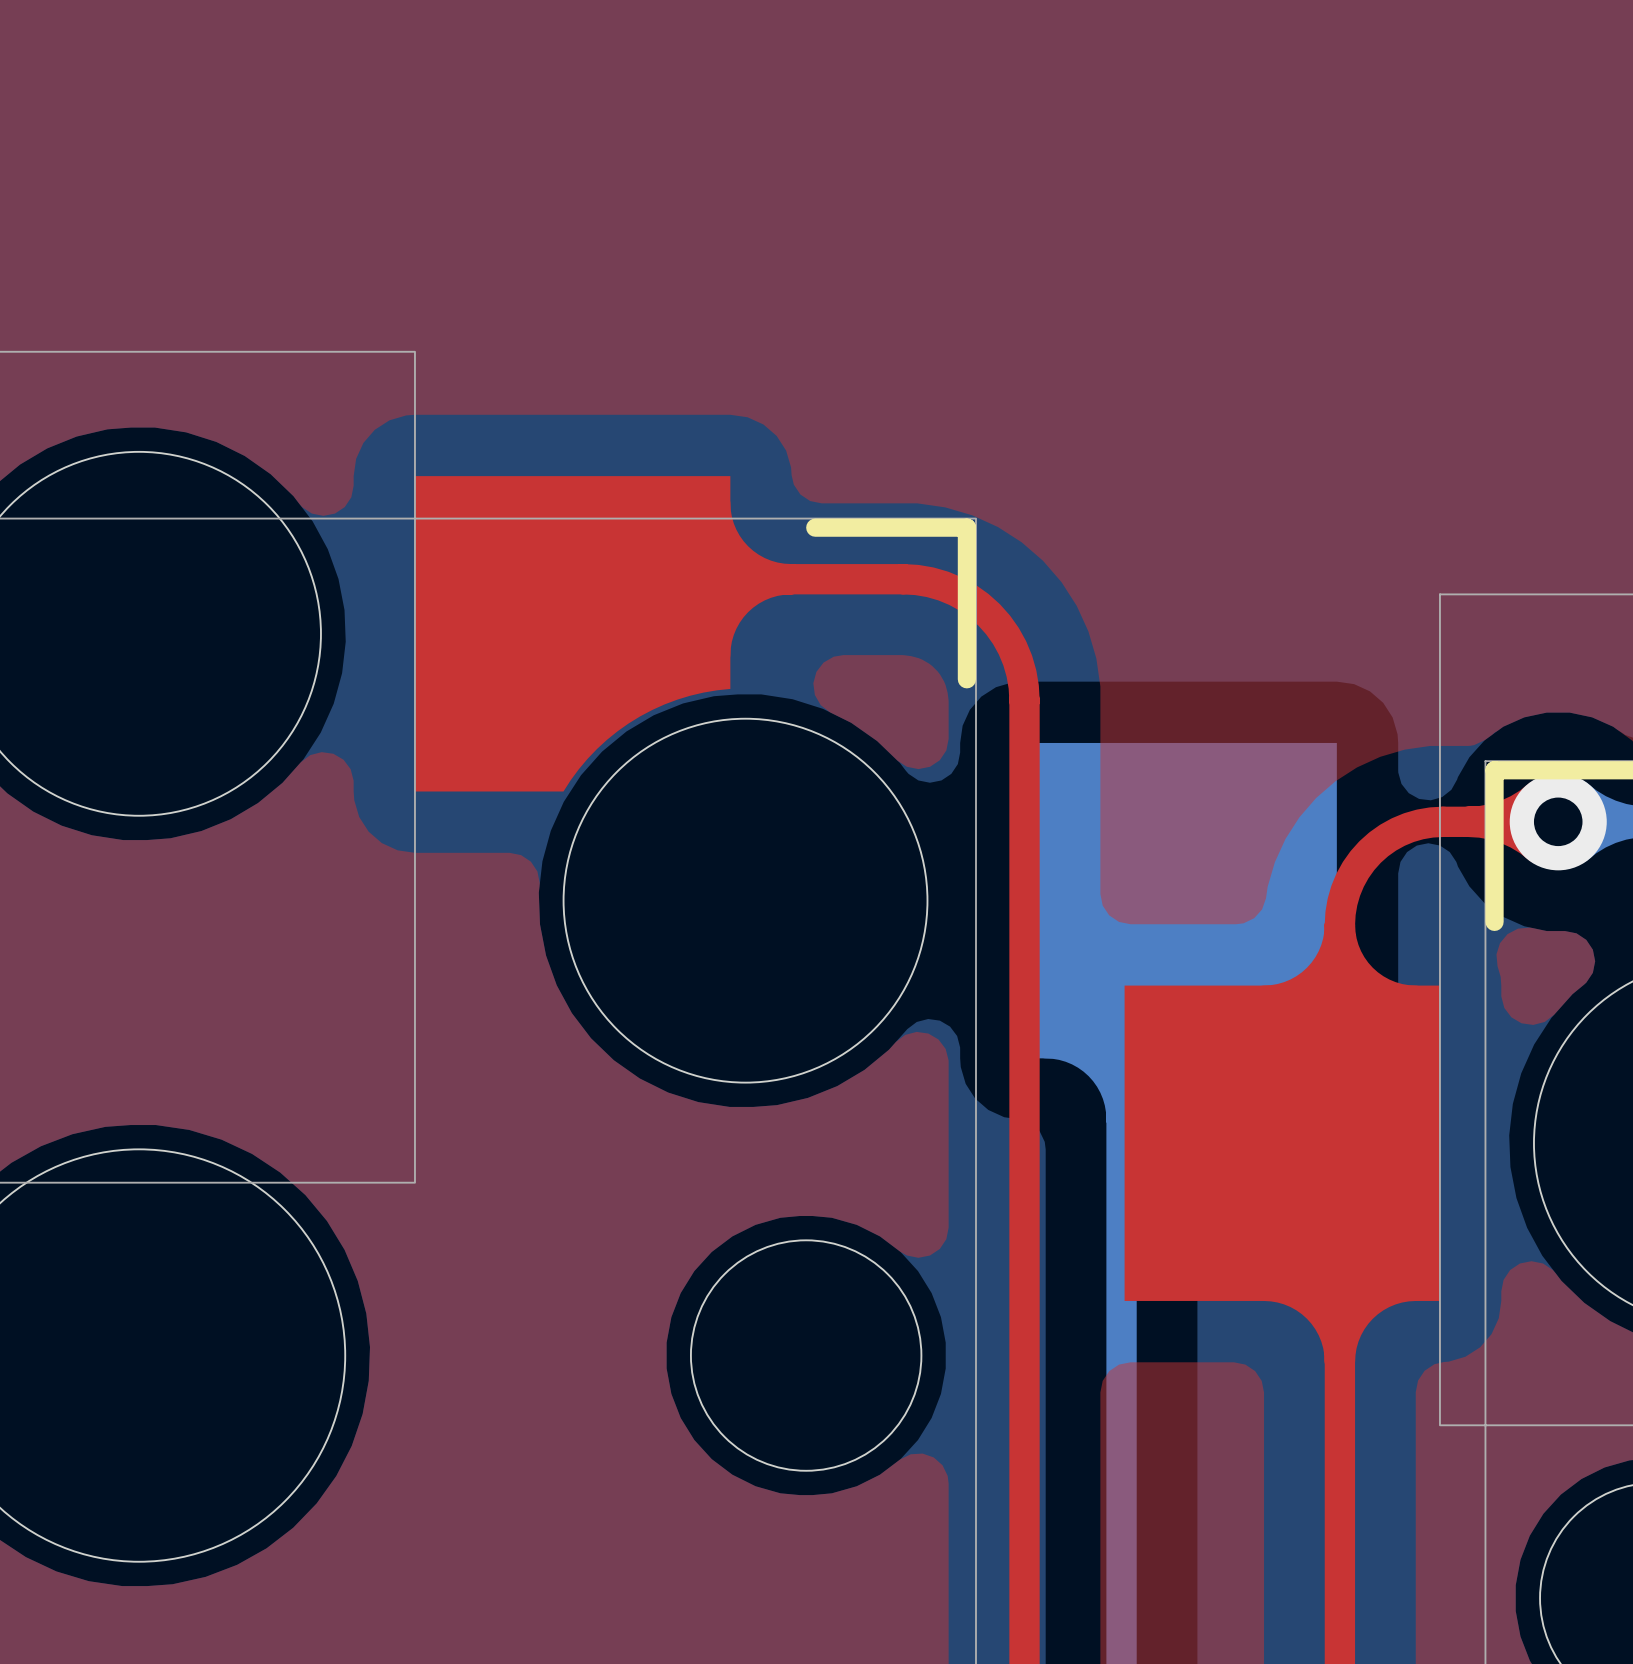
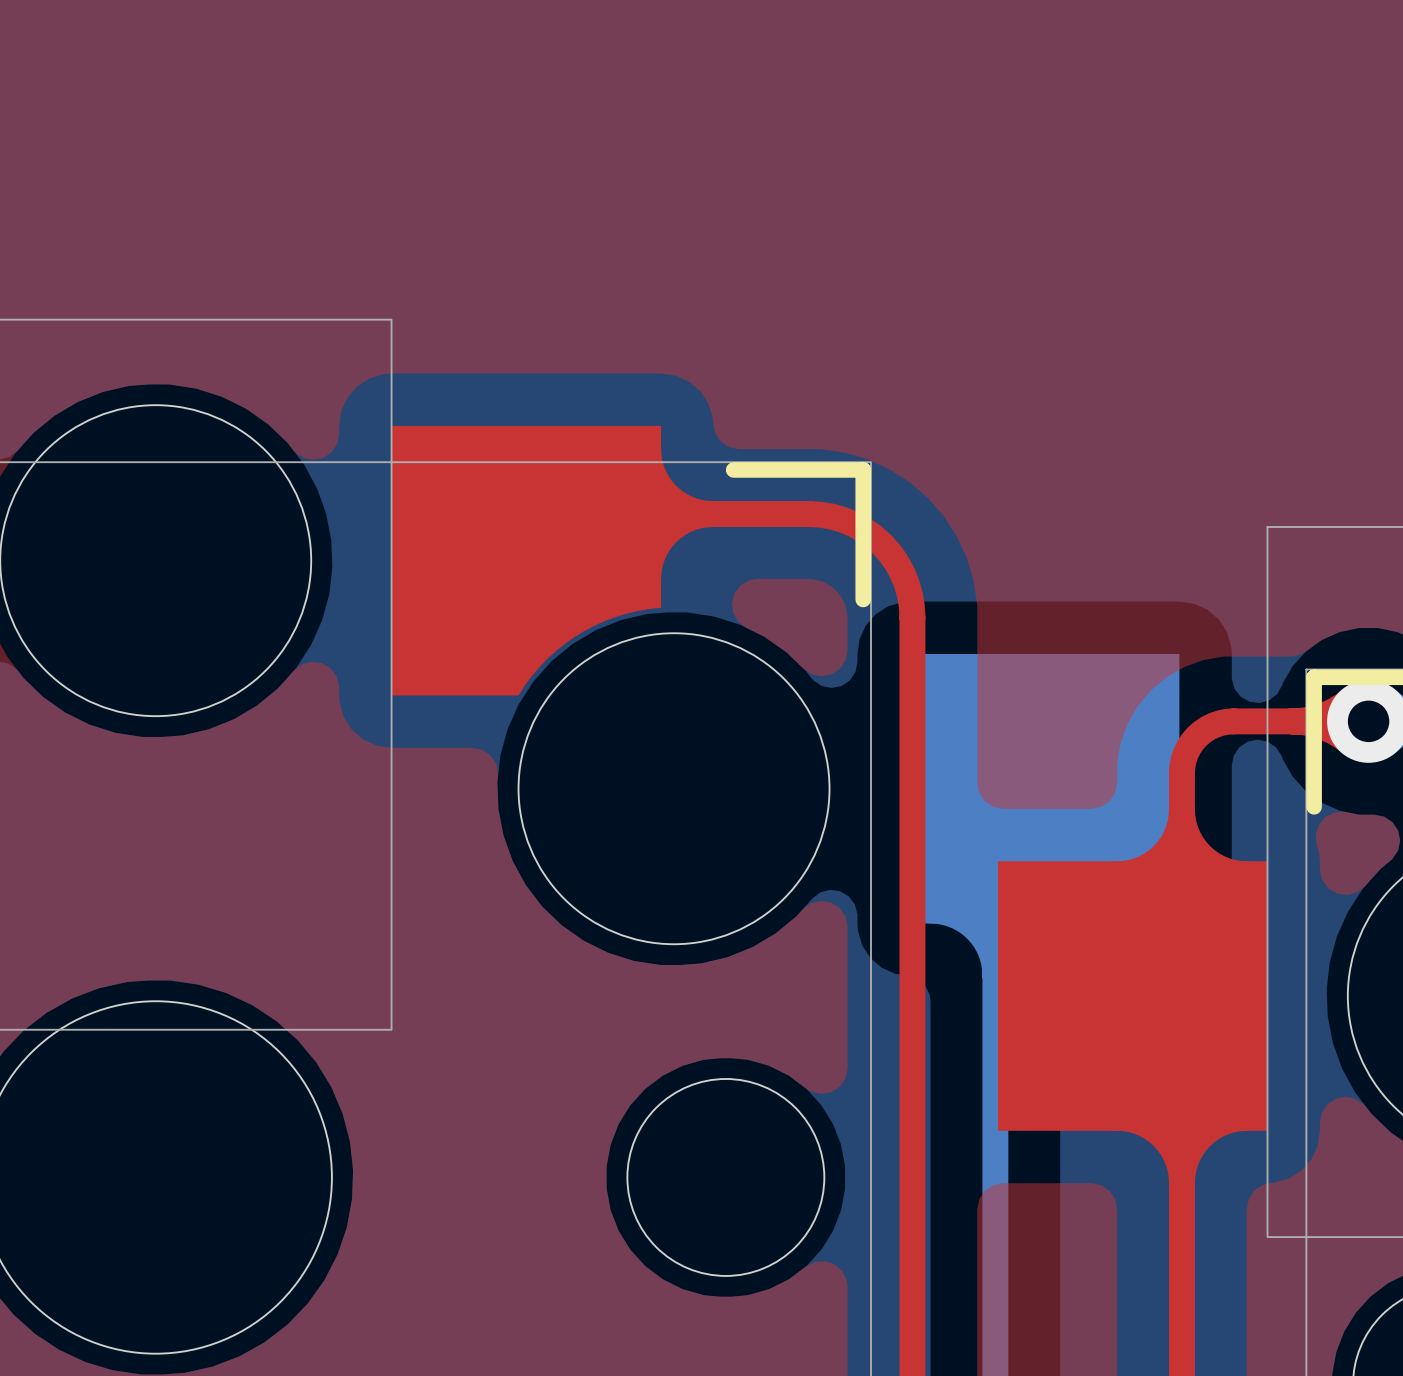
top track: (1443, 821) (1408, 827) (1388, 837) (1370, 852) (1350, 880) (1342, 901) (1339, 924) -> (1270, 721) (1220, 723) (1207, 728) (1197, 736) (1188, 747) (1183, 759) (1181, 809)

